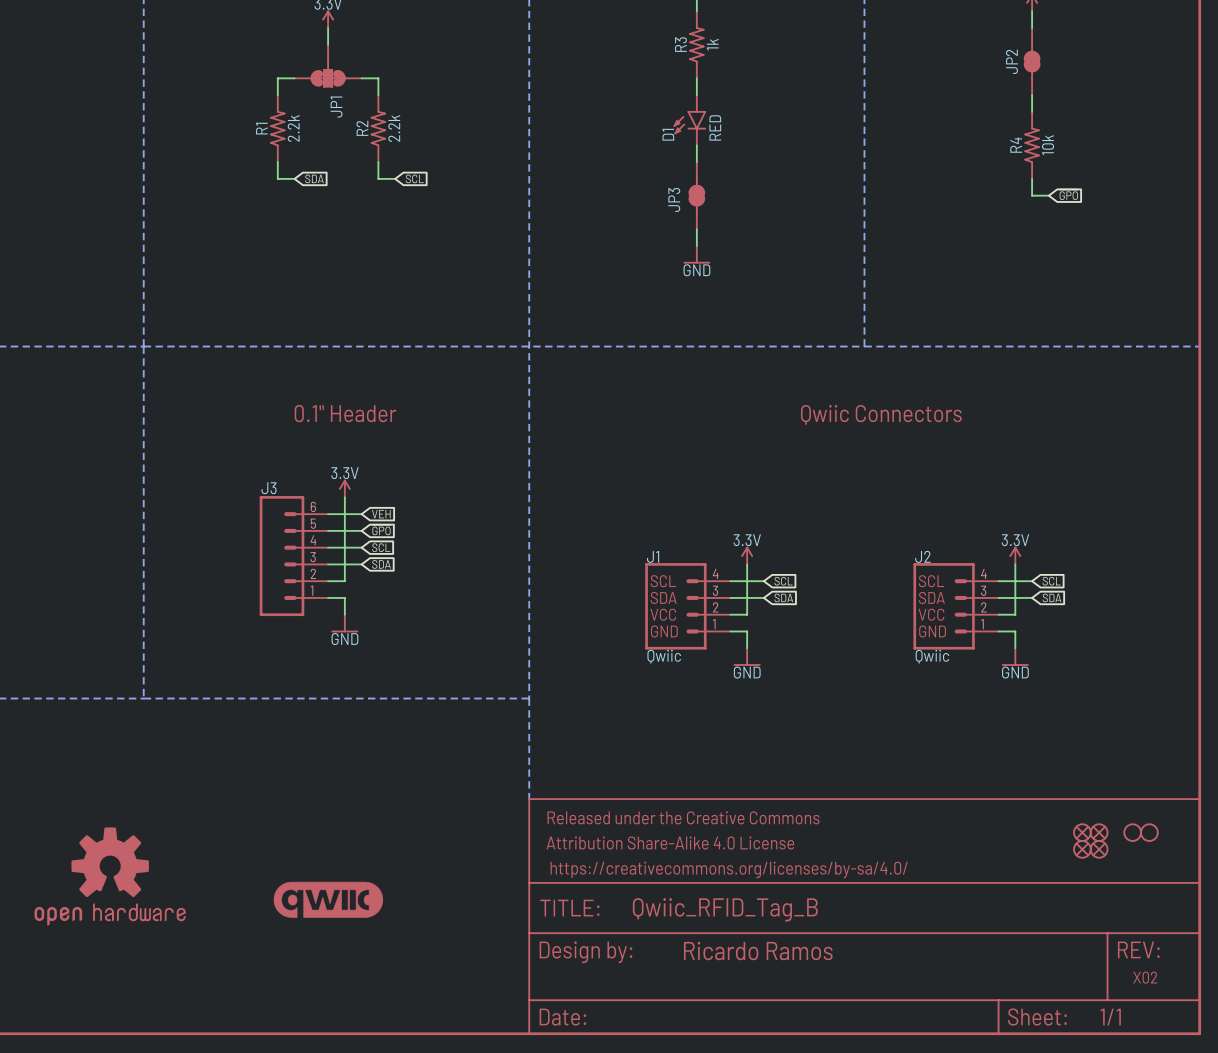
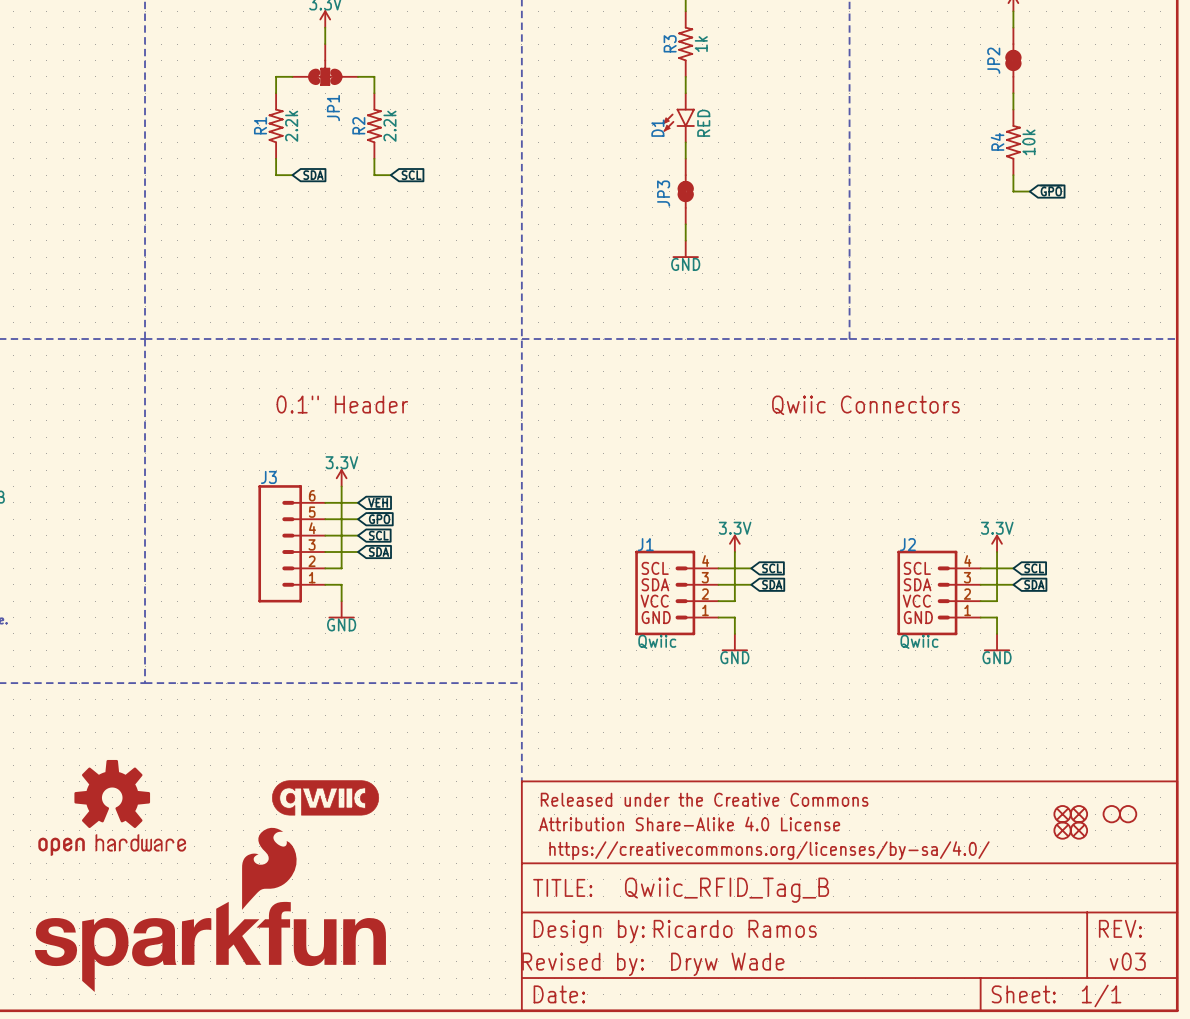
part position: (110, 876) -> (112, 807)
part position: (328, 899) -> (325, 797)
part: none -> (210, 909)
text: none -> Ricardo Ramos (735, 928)
part text: Ricardo Ramos (758, 950) -> none
part text: X02 (1145, 977) -> none
text: none -> v03 (1127, 961)
text: none -> Revised by: Dryw Wade (653, 964)

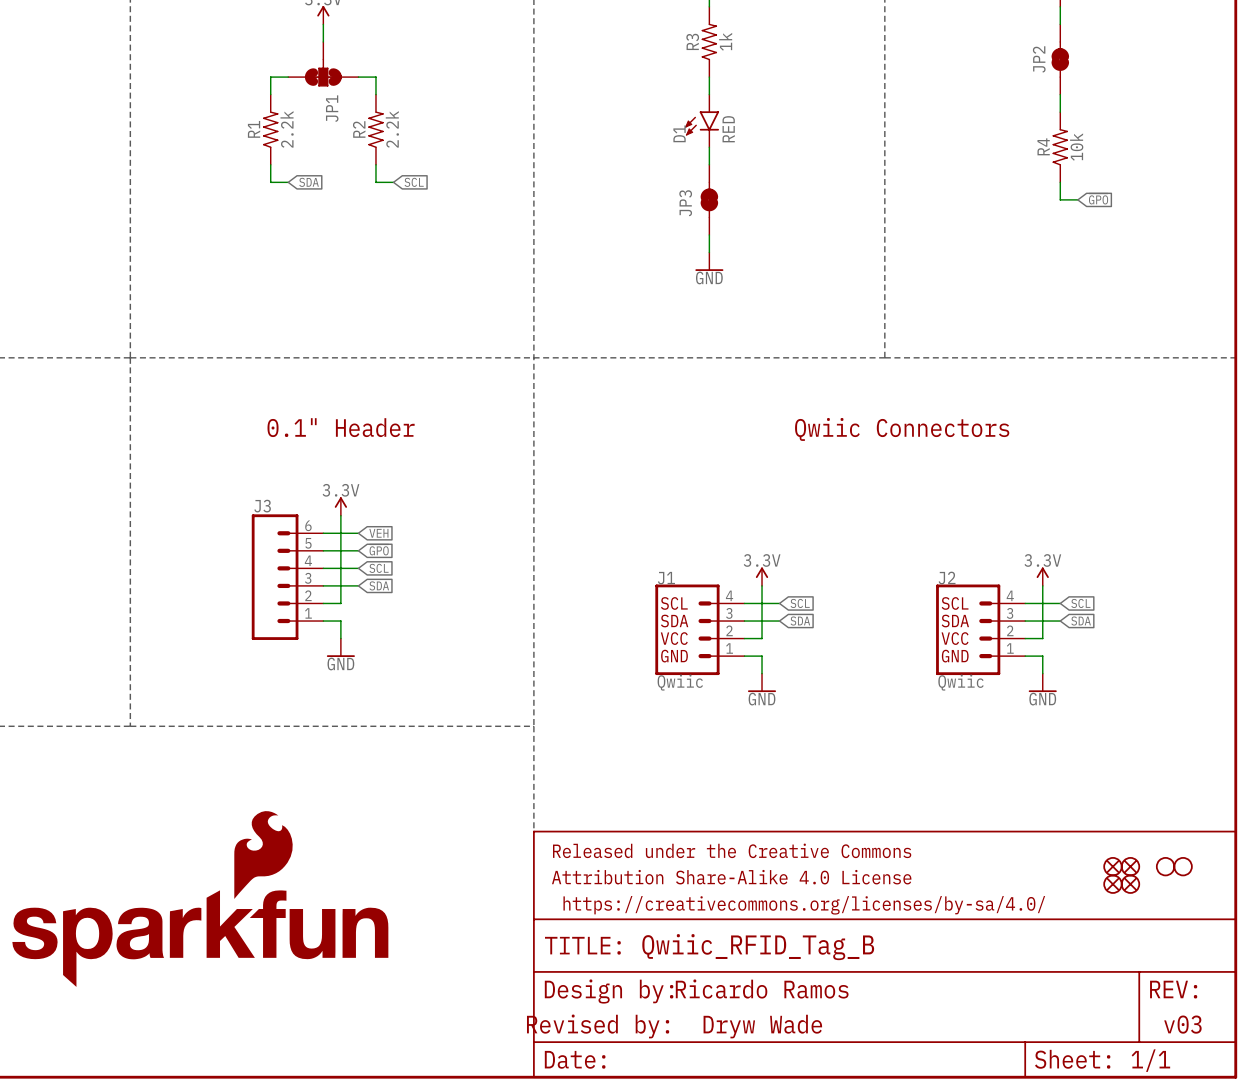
part: (325, 797) -> none
part: (112, 807) -> none
part position: (210, 909) -> (200, 899)

